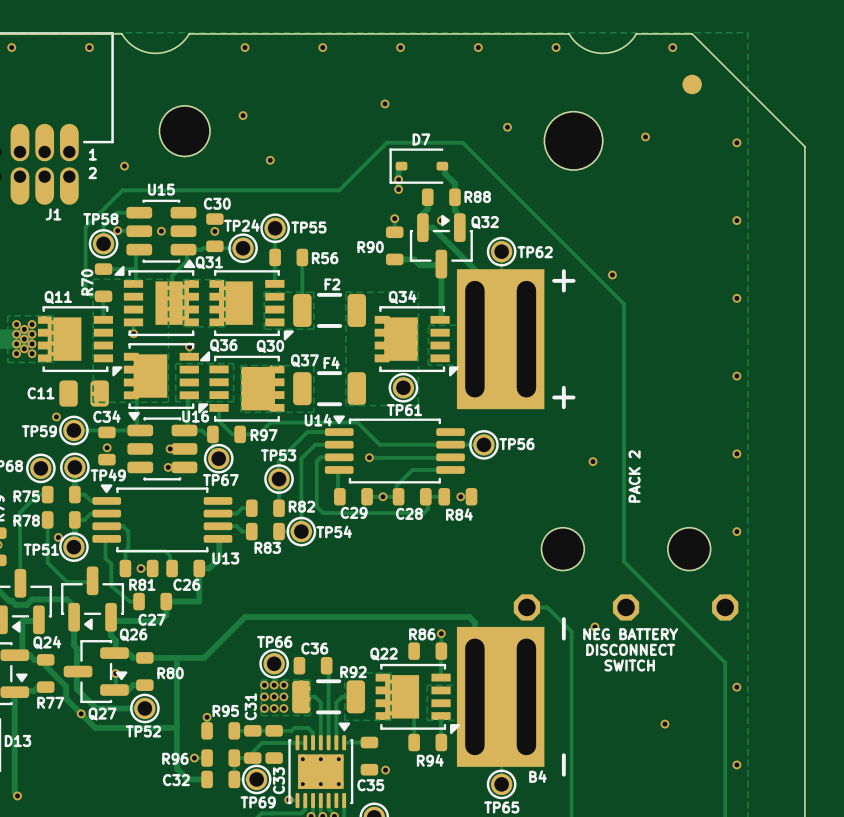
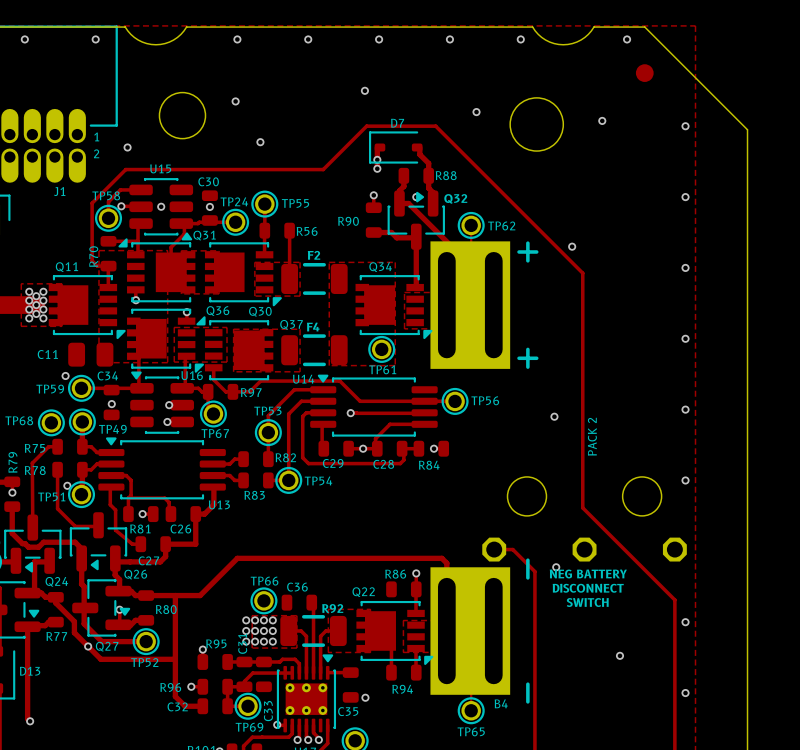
via: none -> (246, 620)
via: none -> (246, 630)
via: none -> (246, 641)

